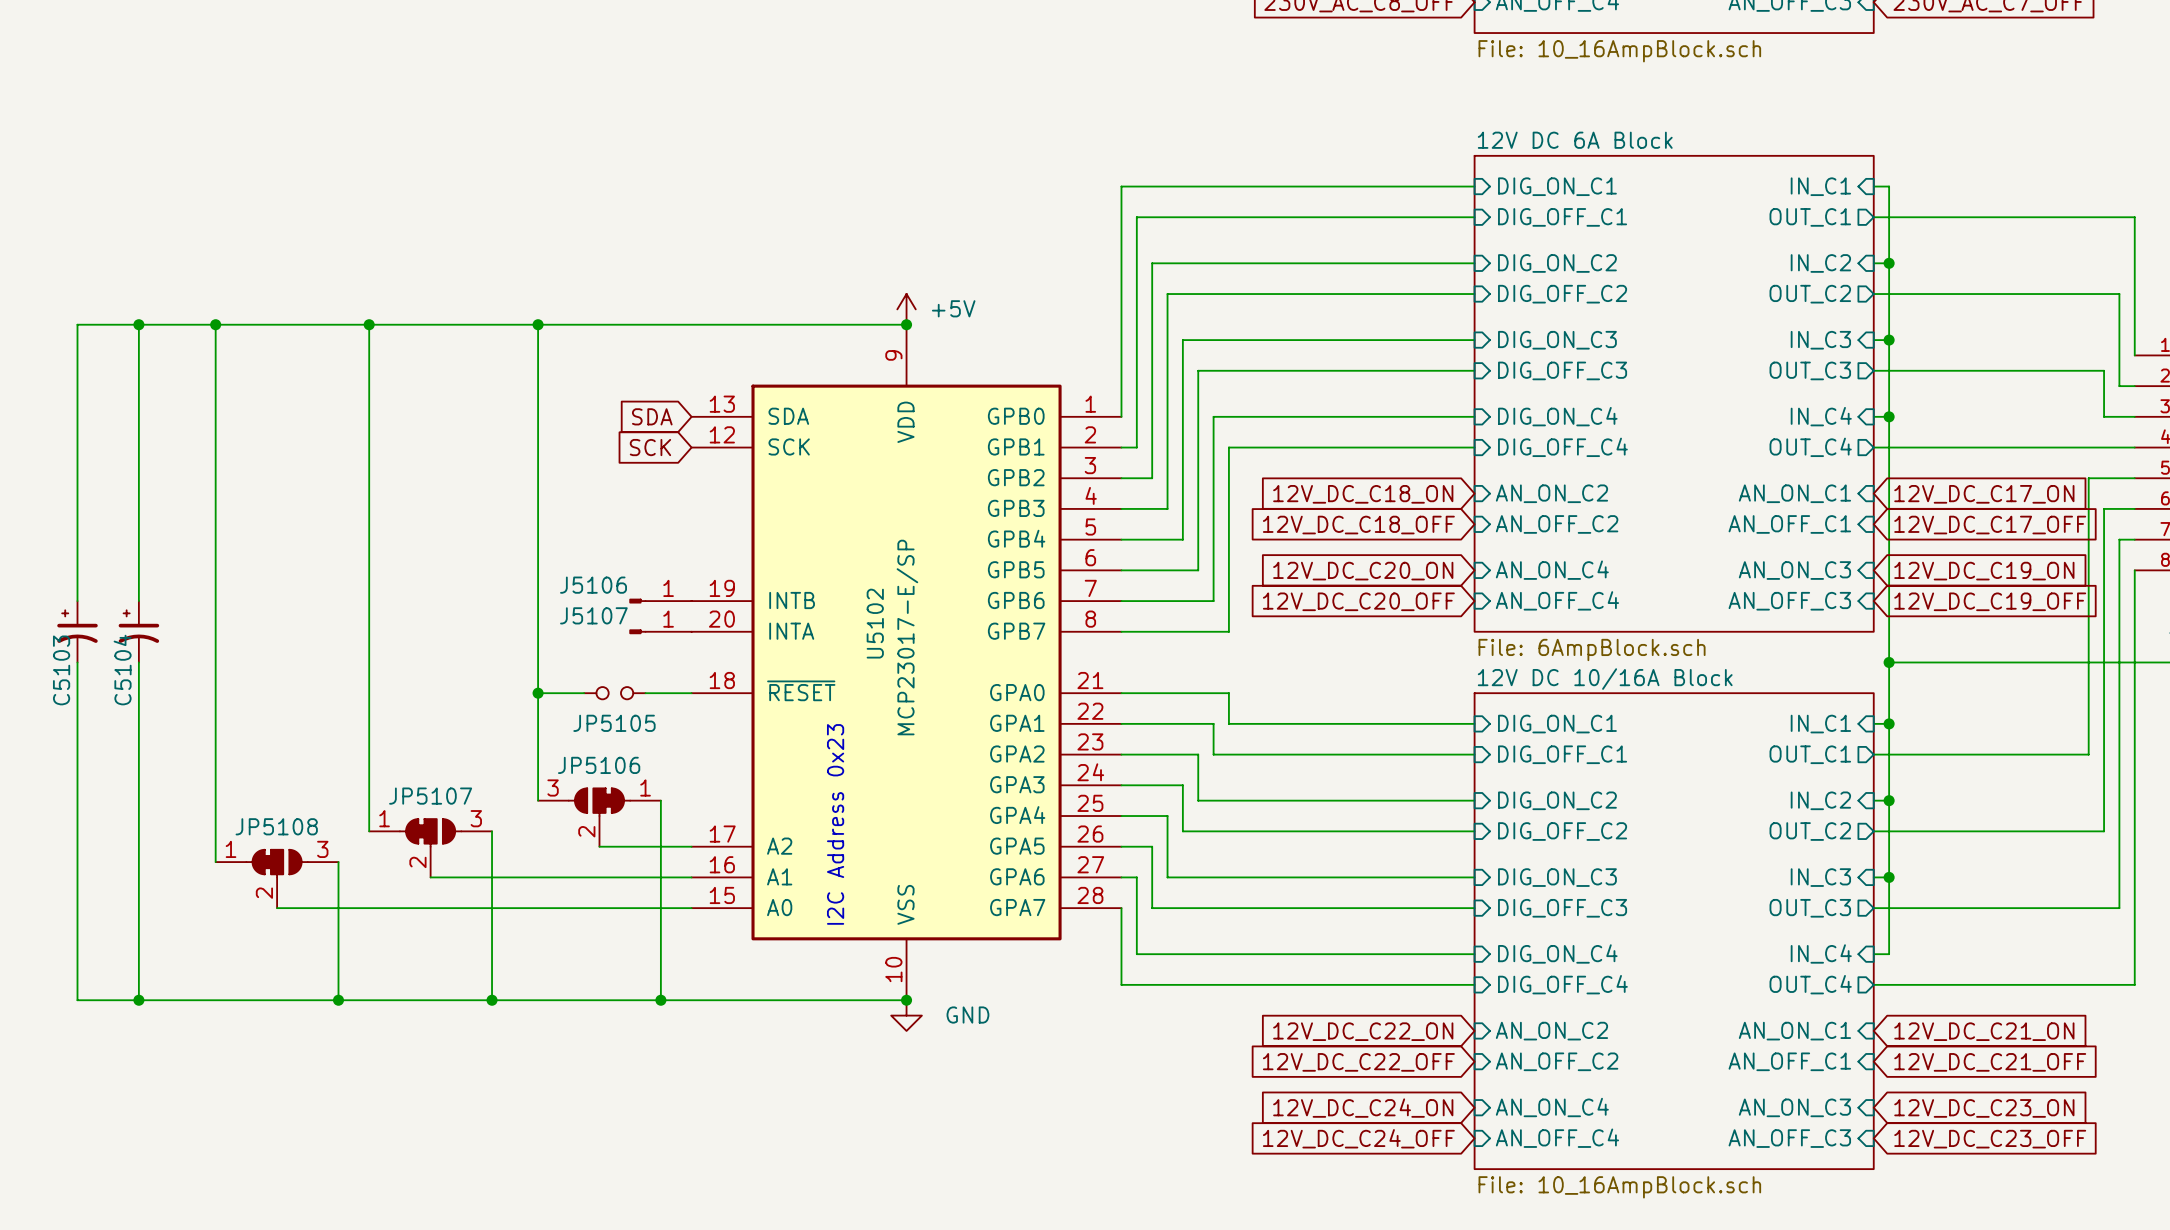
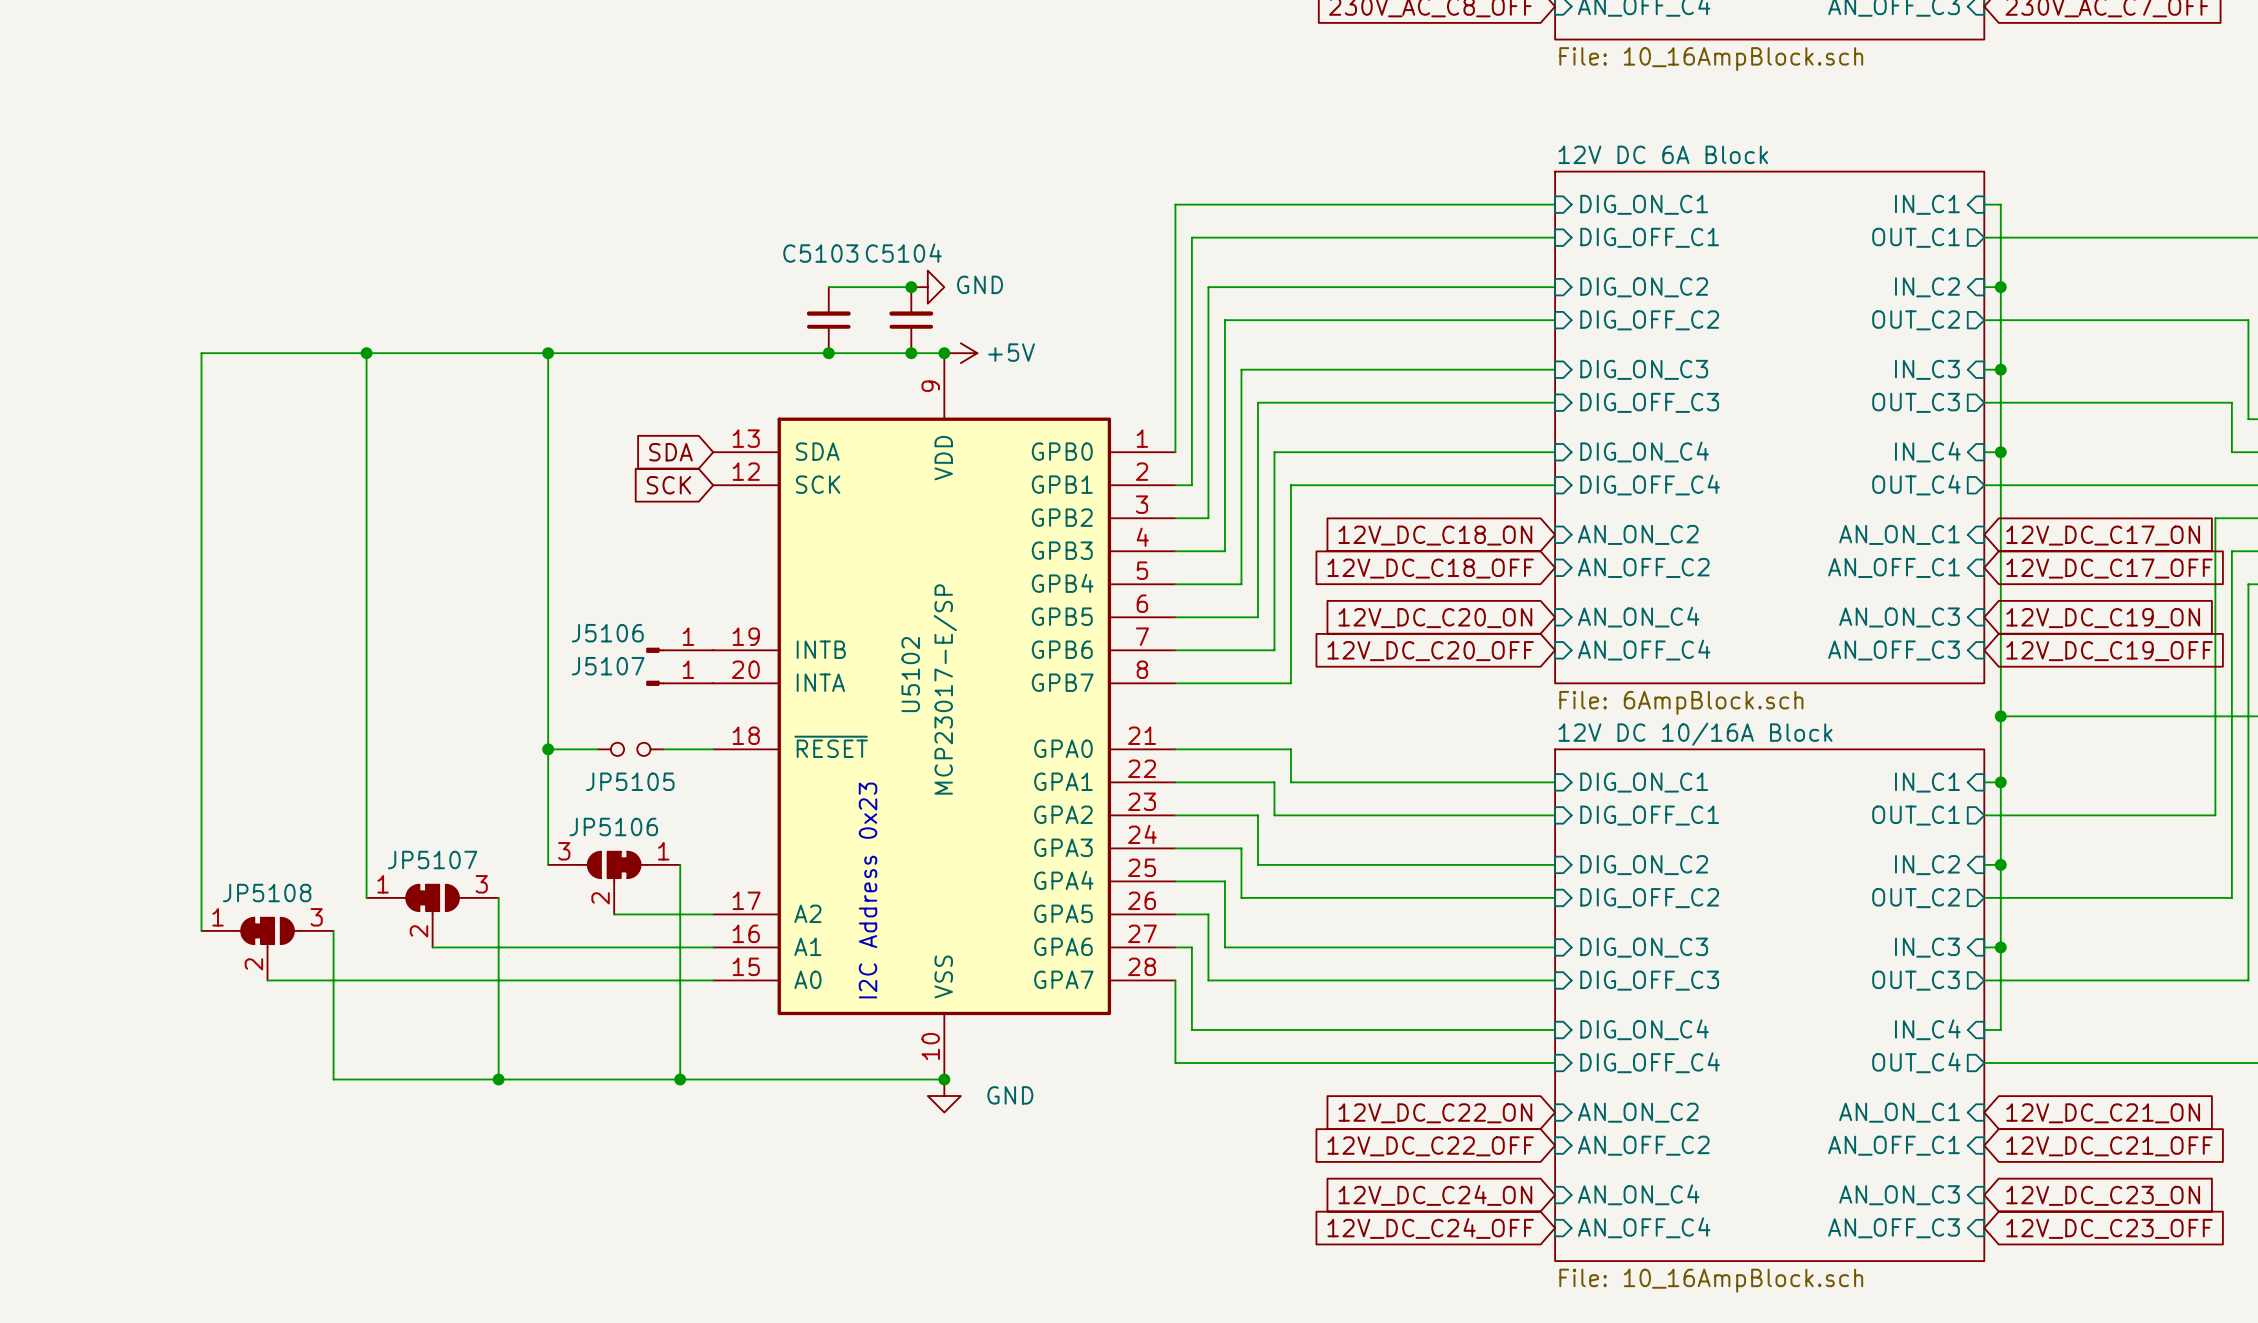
wire: none -> (828, 287) (911, 287)
junction: none -> (911, 287)
power symbol: none -> GND (927, 287)
power symbol rotation: 0° (906, 309) -> 90° clockwise (960, 353)
power symbol position: +5V (906, 309) -> +5V (960, 353)
wire: (138, 324) (138, 601) -> none
junction: (138, 324) -> none
wire: (215, 324) (77, 324) (77, 601) -> none
junction: (215, 324) -> none
junction: none -> (828, 353)
junction: none -> (911, 353)
C5103 symbol: [57, 601, 98, 663] -> [806, 287, 851, 354]
C5104 symbol: [118, 601, 160, 663] -> [889, 287, 934, 354]
wire: (77, 662) (77, 1000) (338, 1000) -> none
wire: (138, 662) (138, 1000) -> none
C5103 name position: C5103 (61, 670) -> C5103 (820, 253)
C5104 name position: C5104 (122, 670) -> C5104 (903, 253)
junction: (138, 1000) -> none
junction: (338, 1000) -> none

